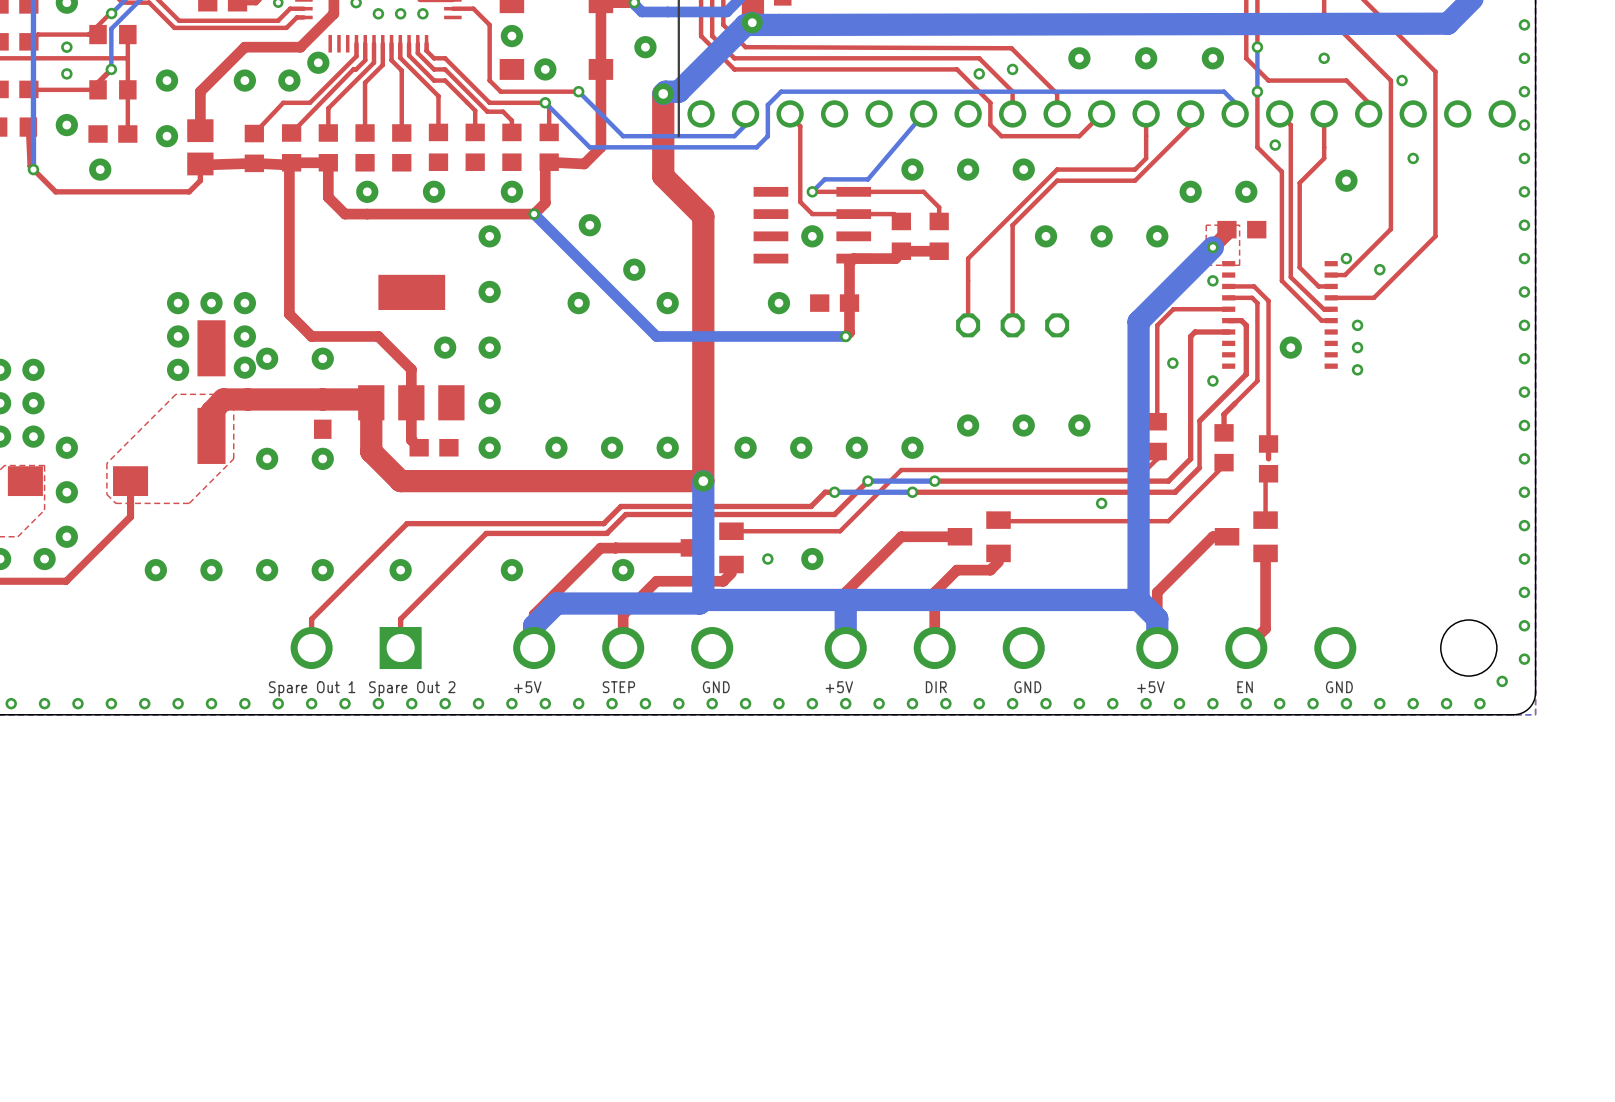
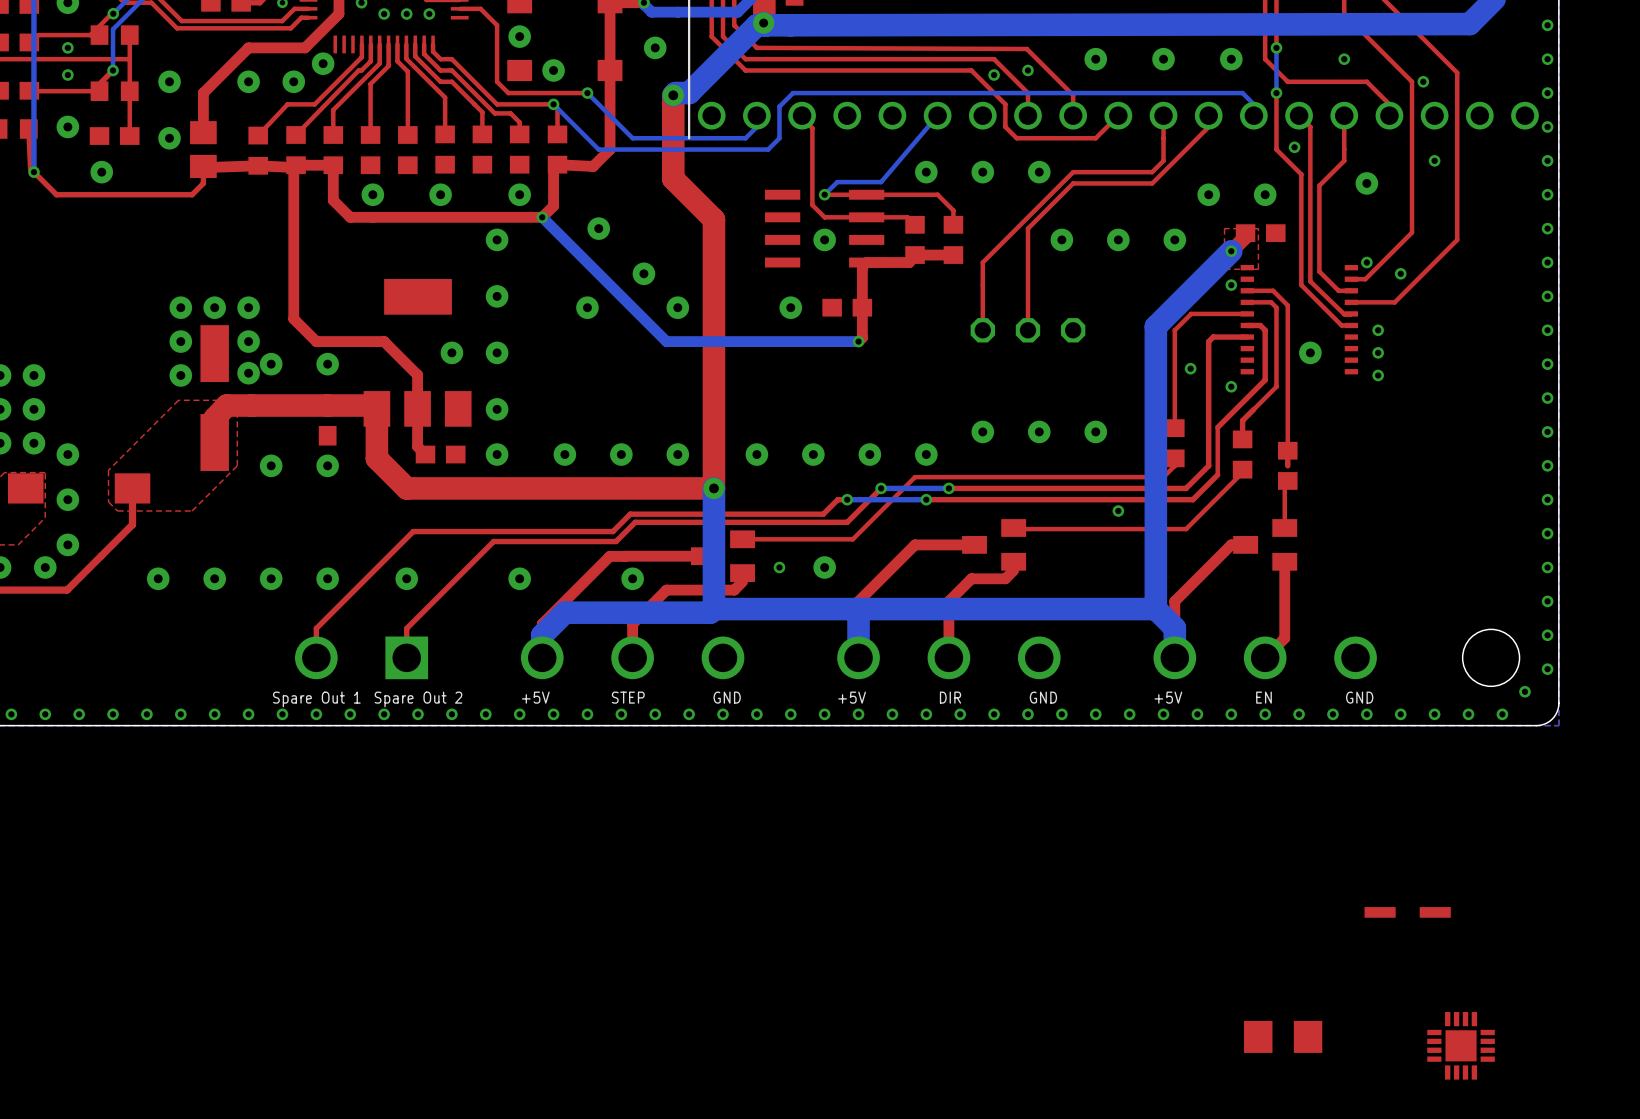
part: none -> (1407, 912)
part: none -> (1283, 1036)
part: none -> (1461, 1045)

